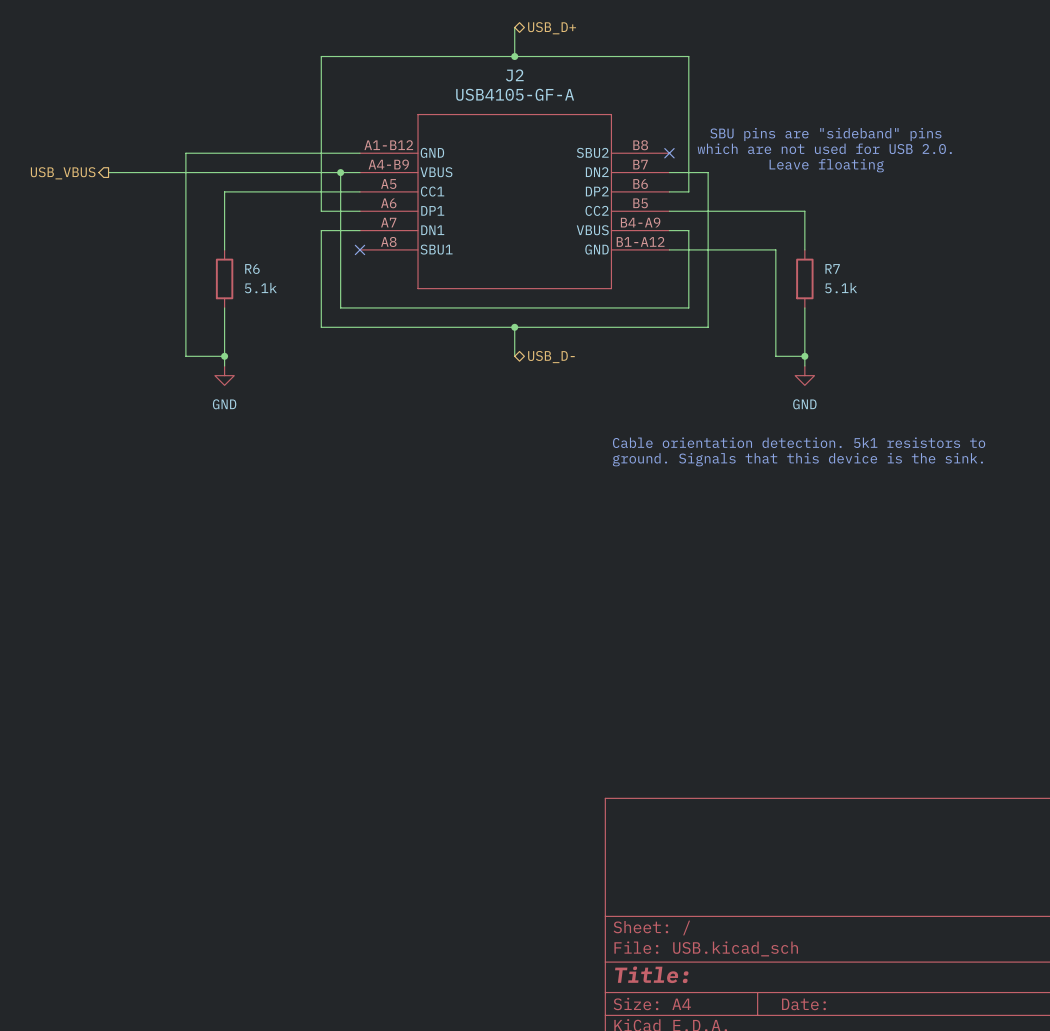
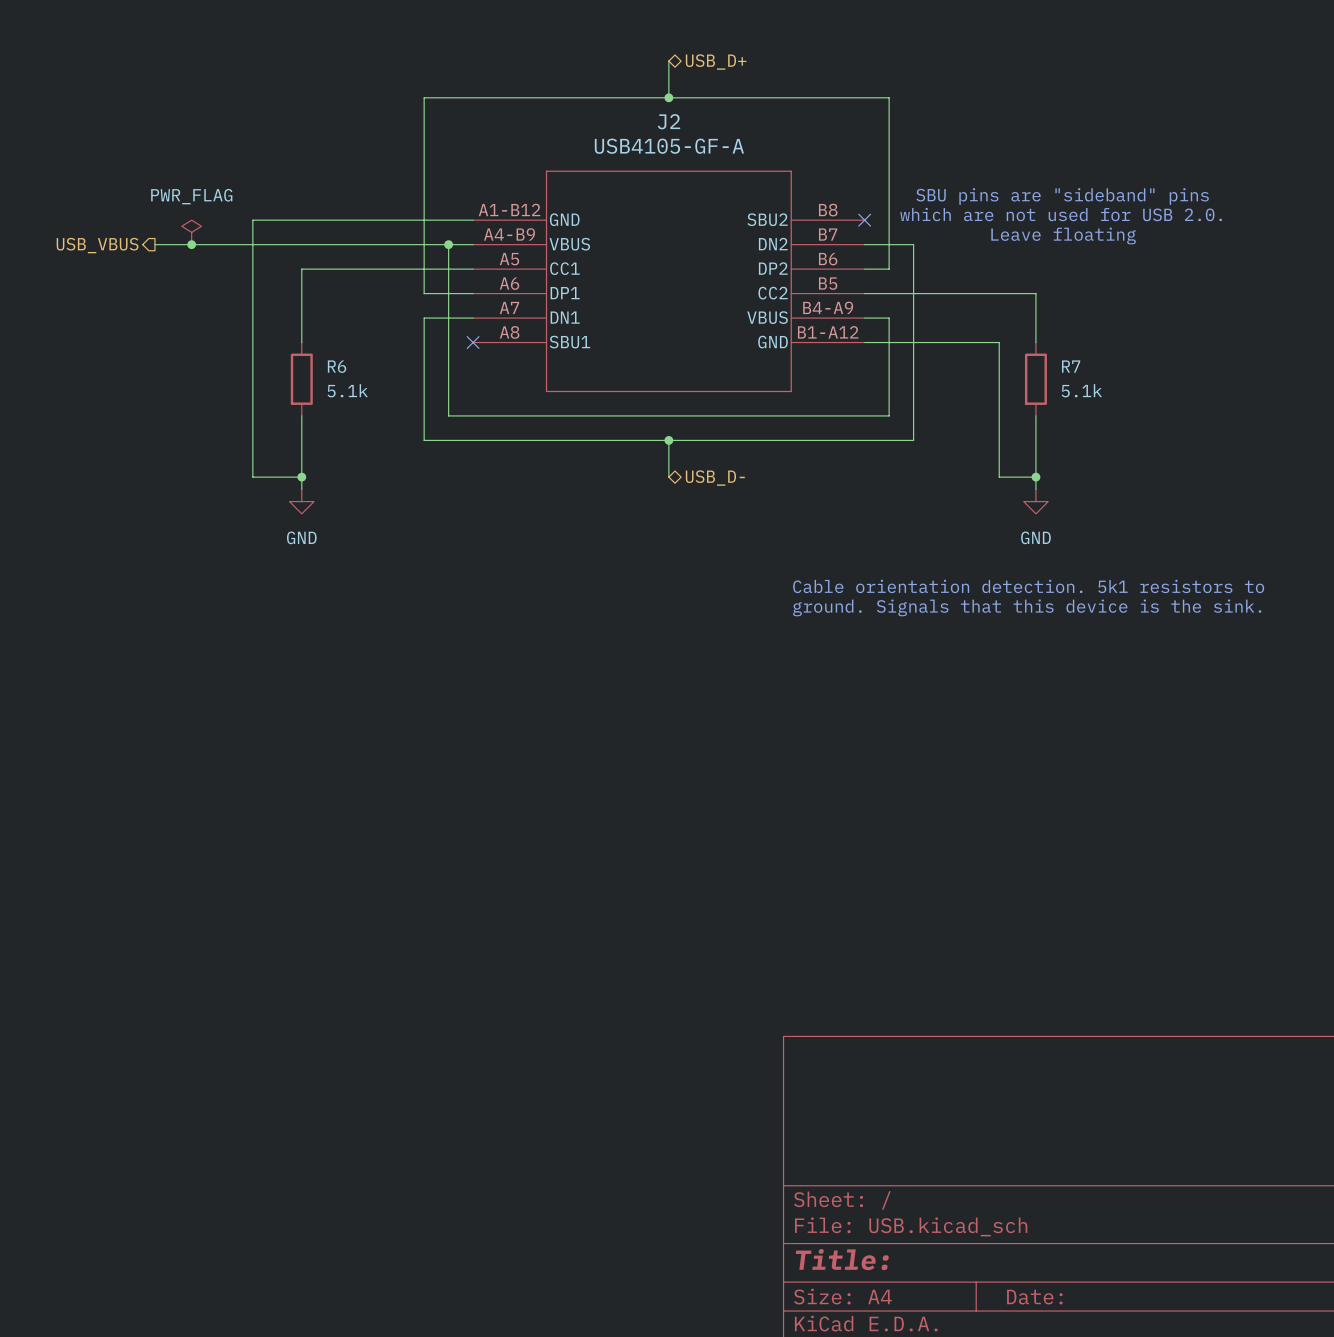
power symbol: none -> PWR_FLAG (191, 232)
junction: none -> (191, 244)

